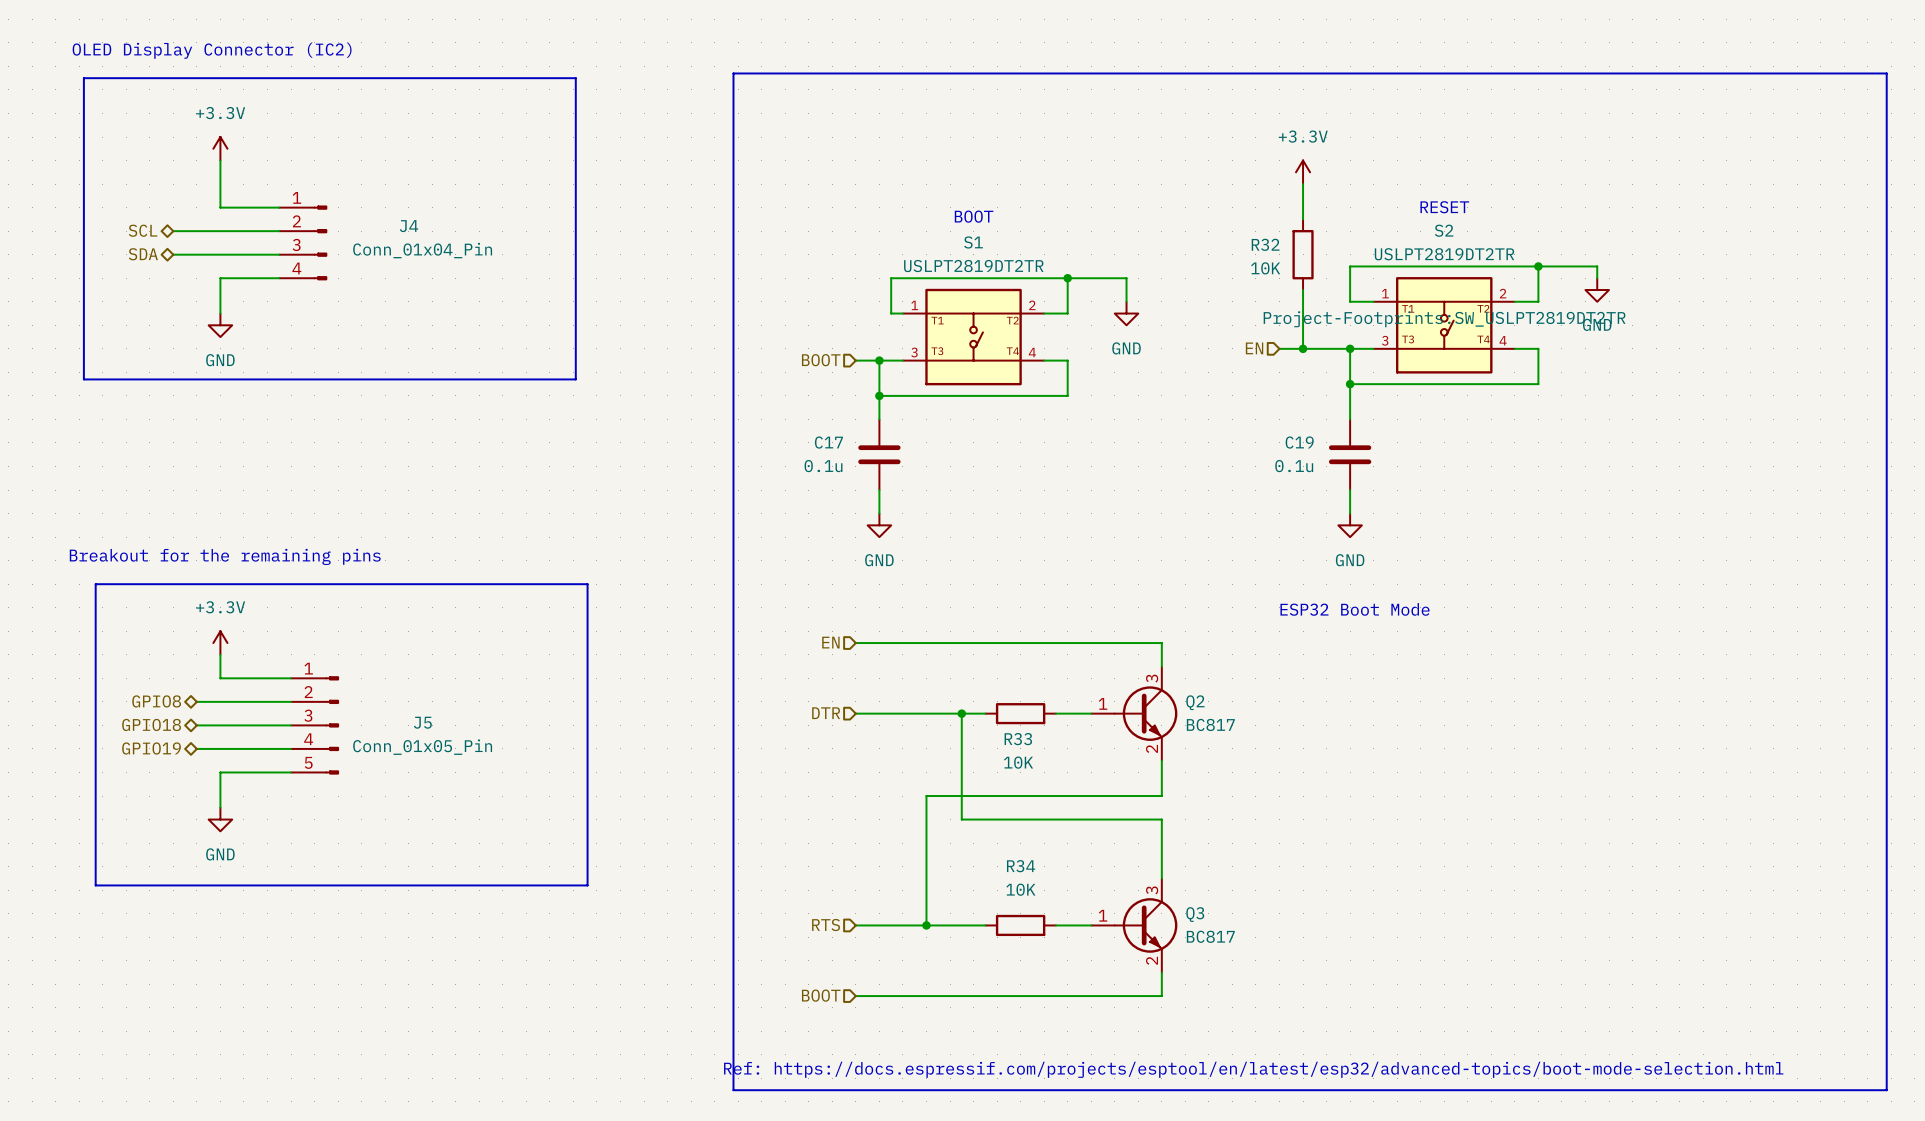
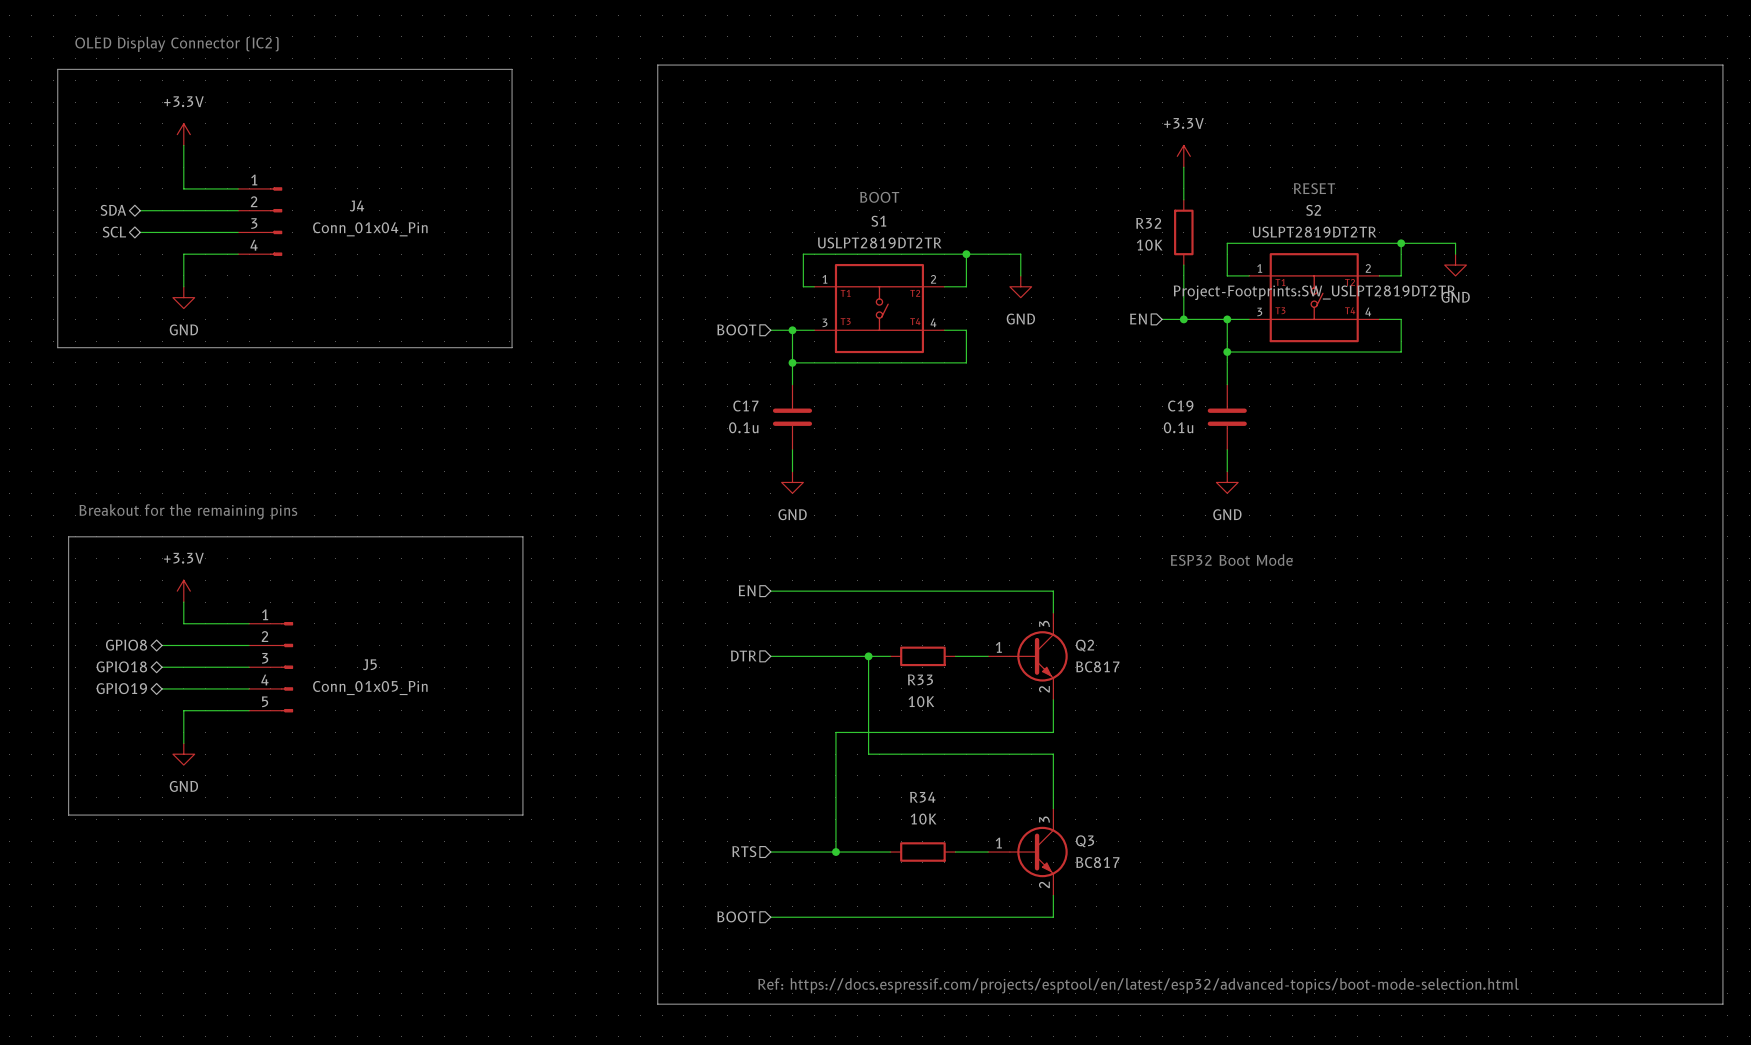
hierarchical label: SCL (143, 230) -> SDA (113, 210)
hierarchical label: SDA (143, 254) -> SCL (114, 232)

